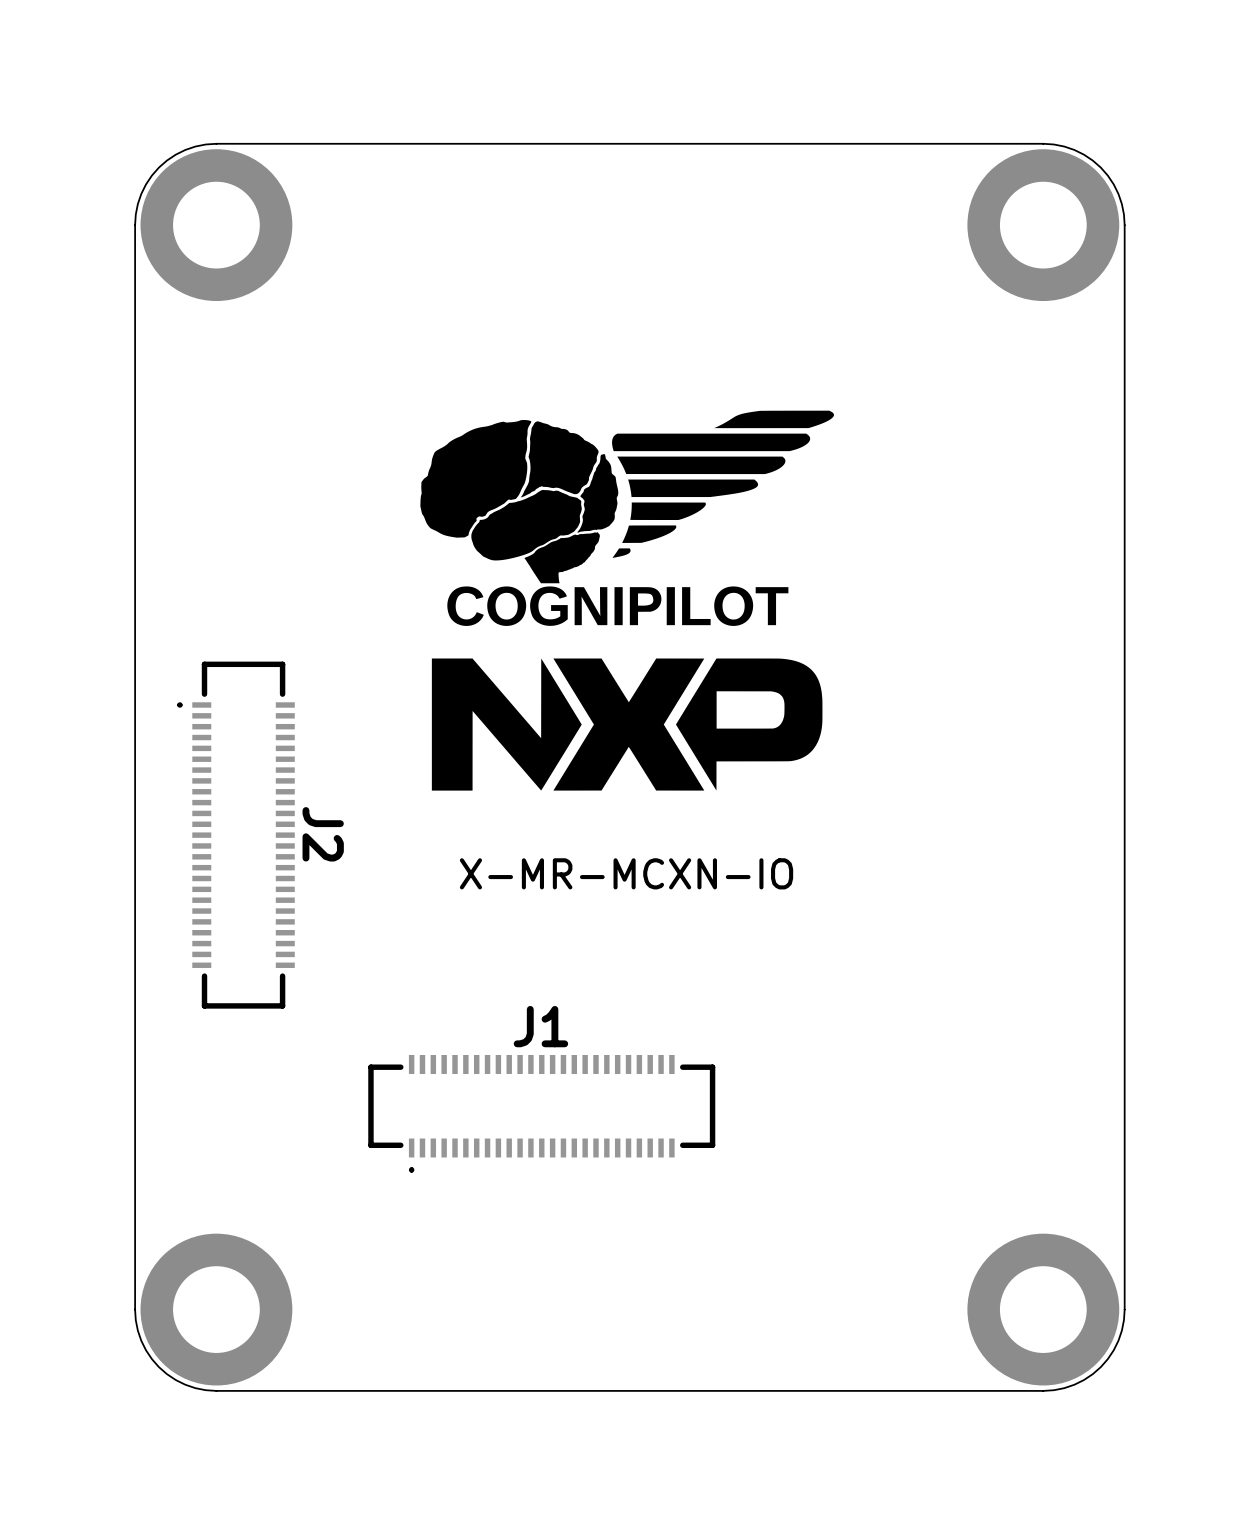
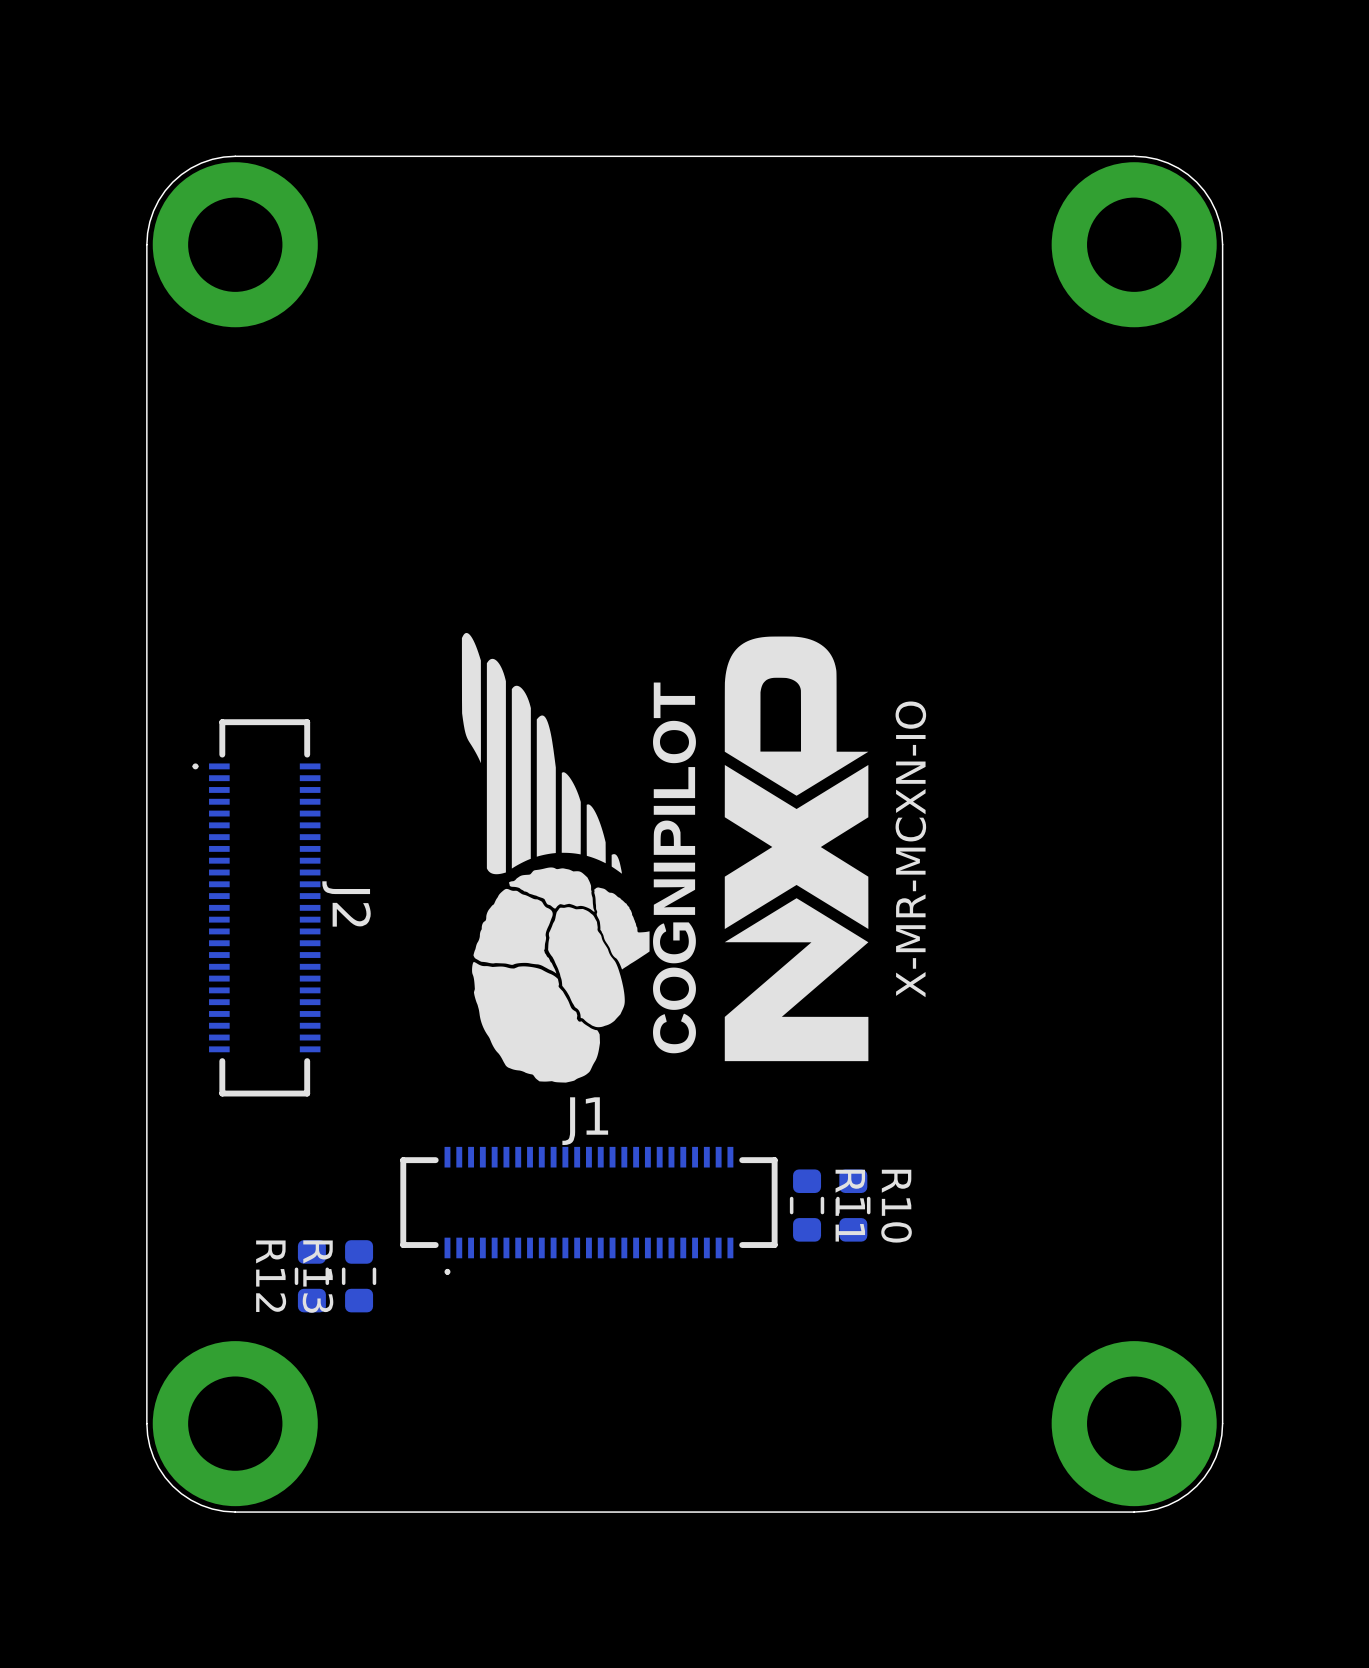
drawing: [420, 410, 834, 626] -> none
drawing: none -> [461, 632, 869, 1083]
drawing shape: [431, 658, 823, 791] -> [653, 767, 696, 799]
text rotation: 0° (626, 873) -> 90° counterclockwise (910, 849)
R11: none -> (807, 1205)
R10: none -> (853, 1205)
R12: none -> (311, 1276)
R13: none -> (359, 1276)

